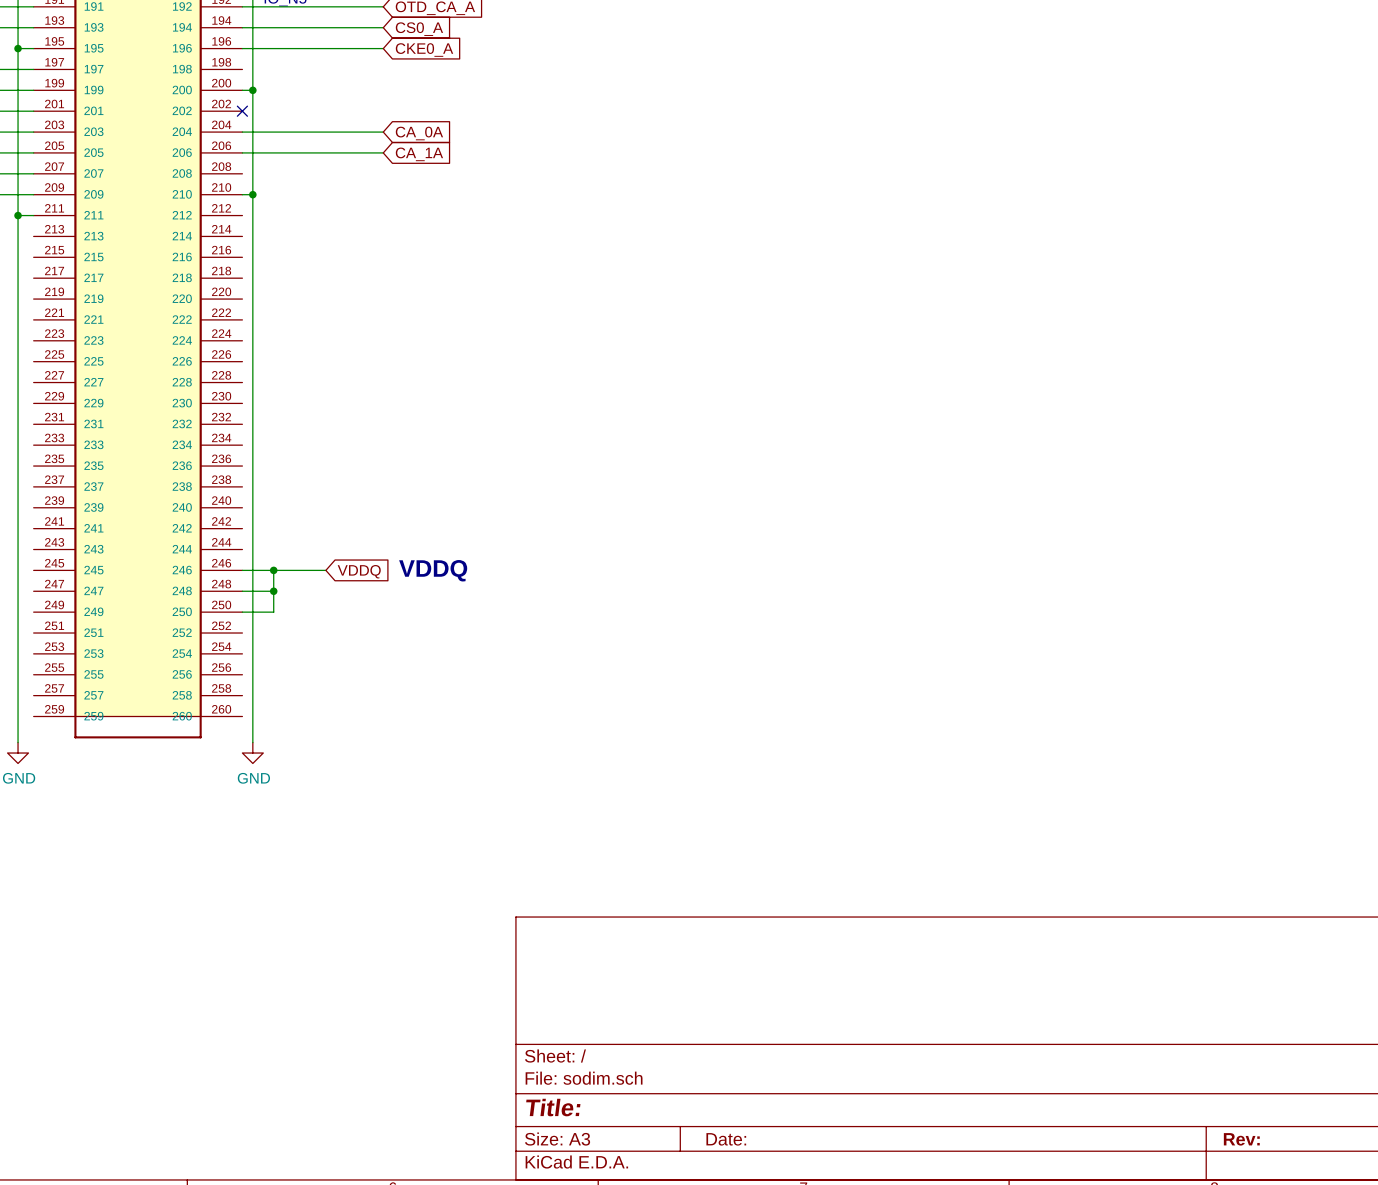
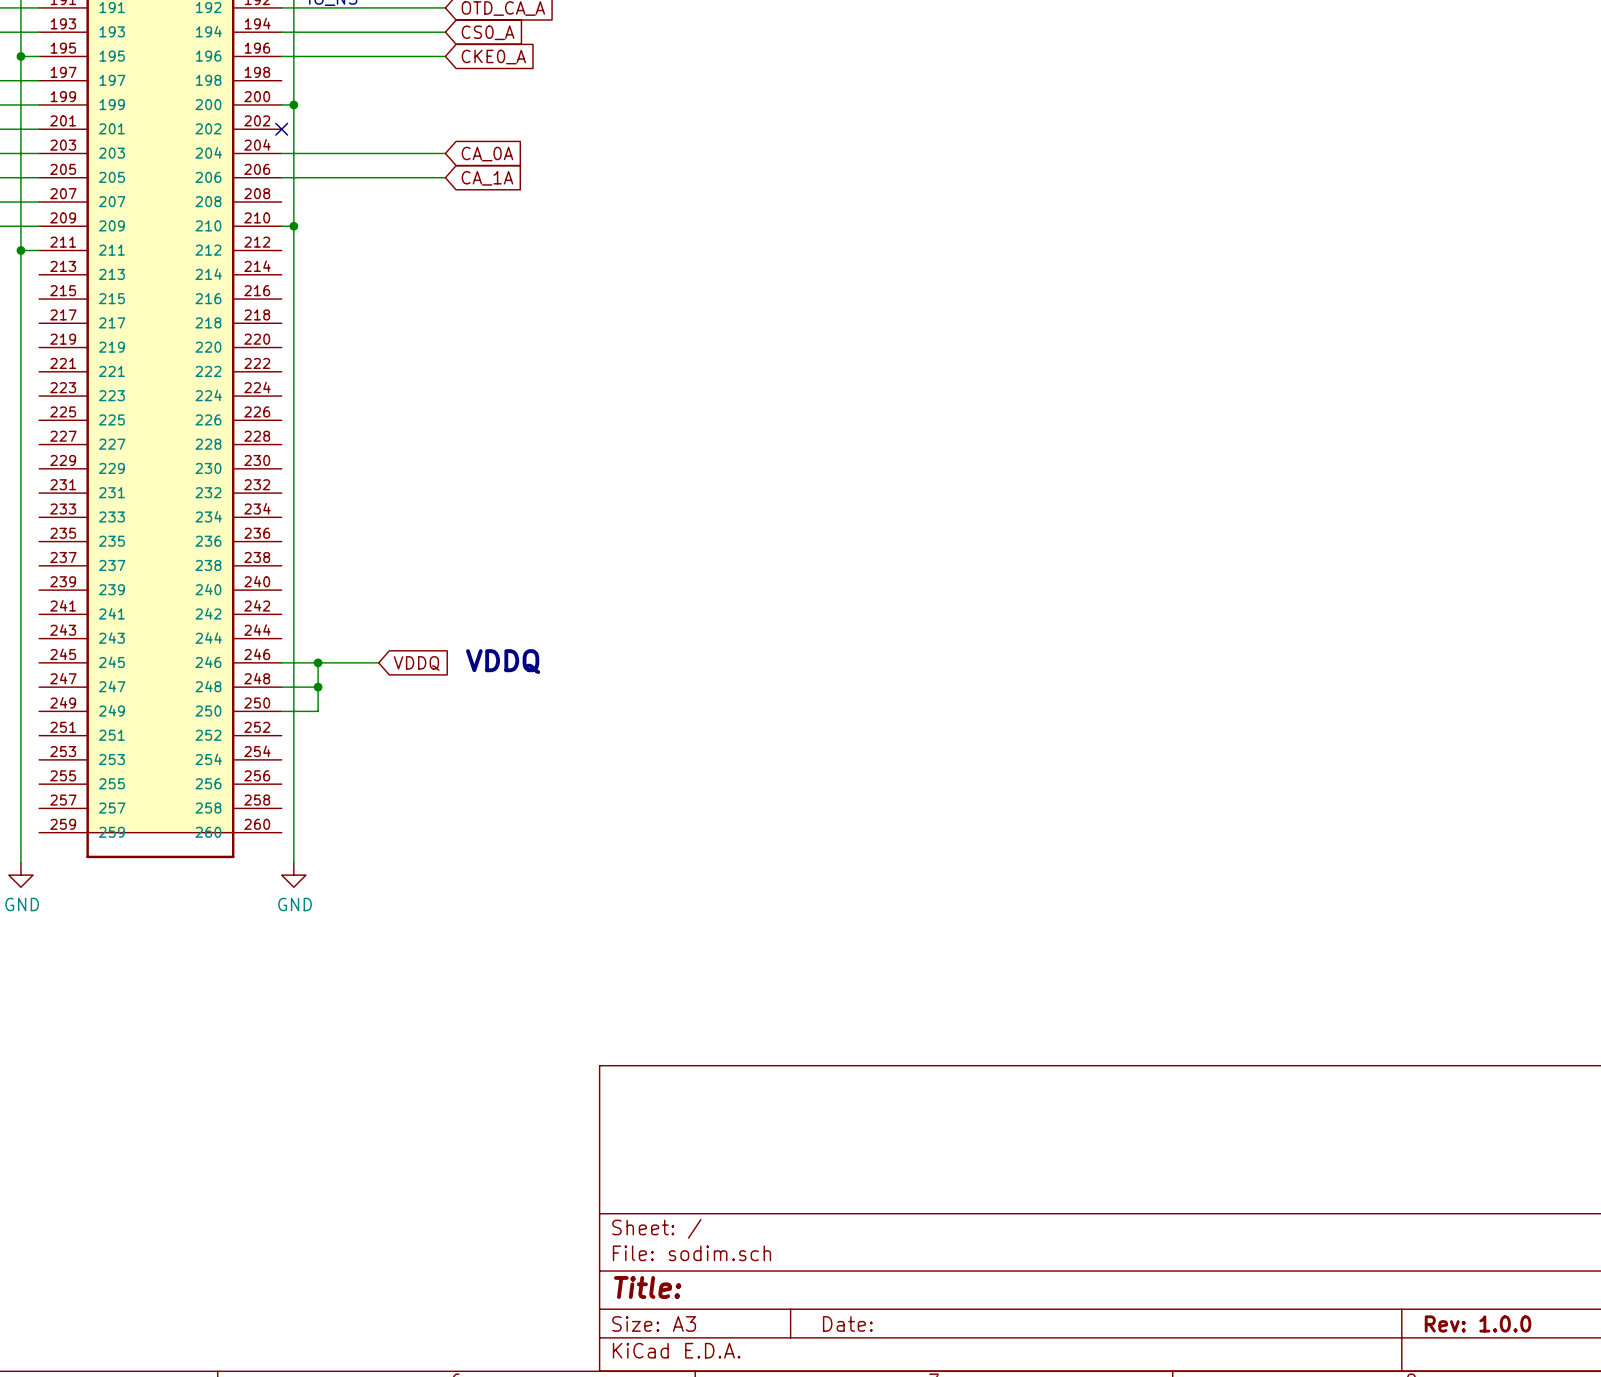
title block: Rev: (1241, 1139) -> Rev: 1.0.0 (1478, 1323)

